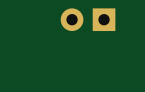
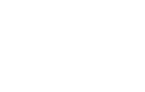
part: (88, 19) -> none

